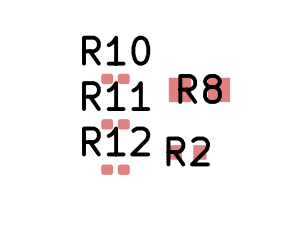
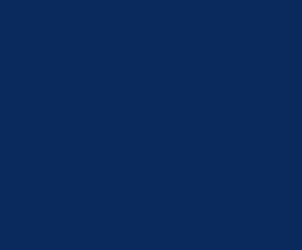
R10: (115, 78) -> none
R8: (199, 89) -> none
R11: (115, 124) -> none
R2: (187, 152) -> none
R12: (115, 169) -> none

